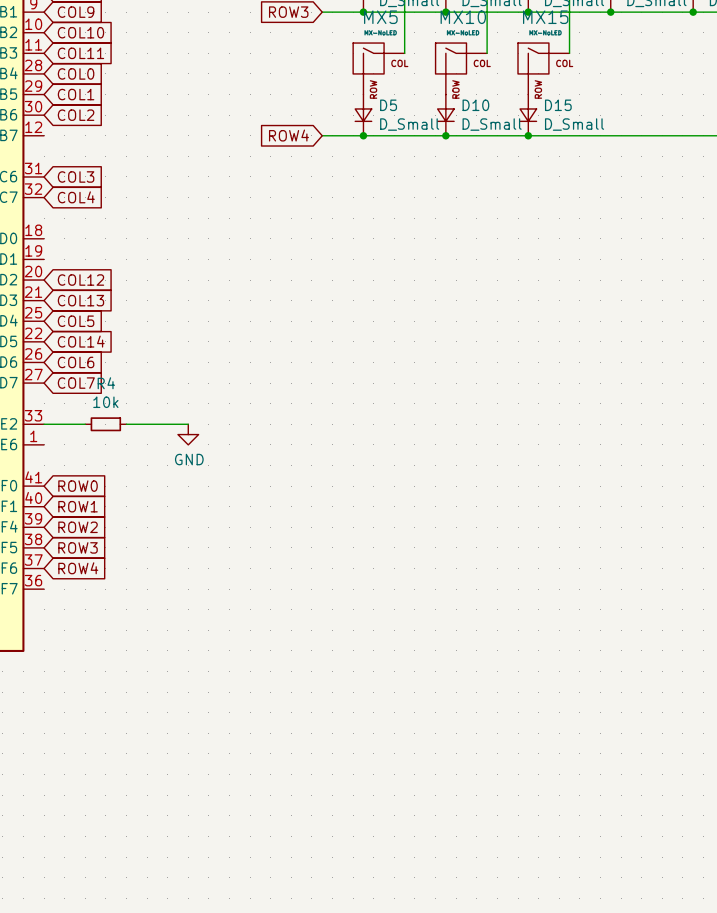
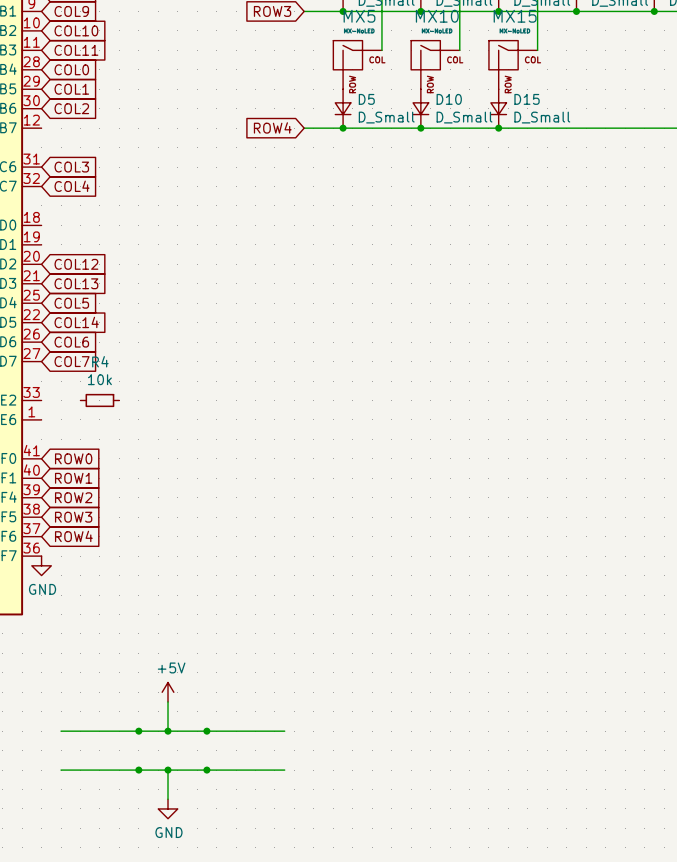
wire: (44, 424) (85, 424) -> none
wire: (126, 424) (188, 424) -> none
power symbol: GND (188, 434) -> none
power symbol: none -> GND (41, 565)
power symbol: none -> +5V (168, 692)
wire: none -> (168, 701) (168, 731)
wire: none -> (61, 731) (284, 731)
junction: none -> (138, 731)
junction: none -> (168, 731)
junction: none -> (206, 731)
wire: none -> (61, 770) (284, 770)
junction: none -> (138, 770)
wire: none -> (168, 770) (168, 799)
junction: none -> (168, 770)
junction: none -> (206, 770)
power symbol: none -> GND (168, 808)

